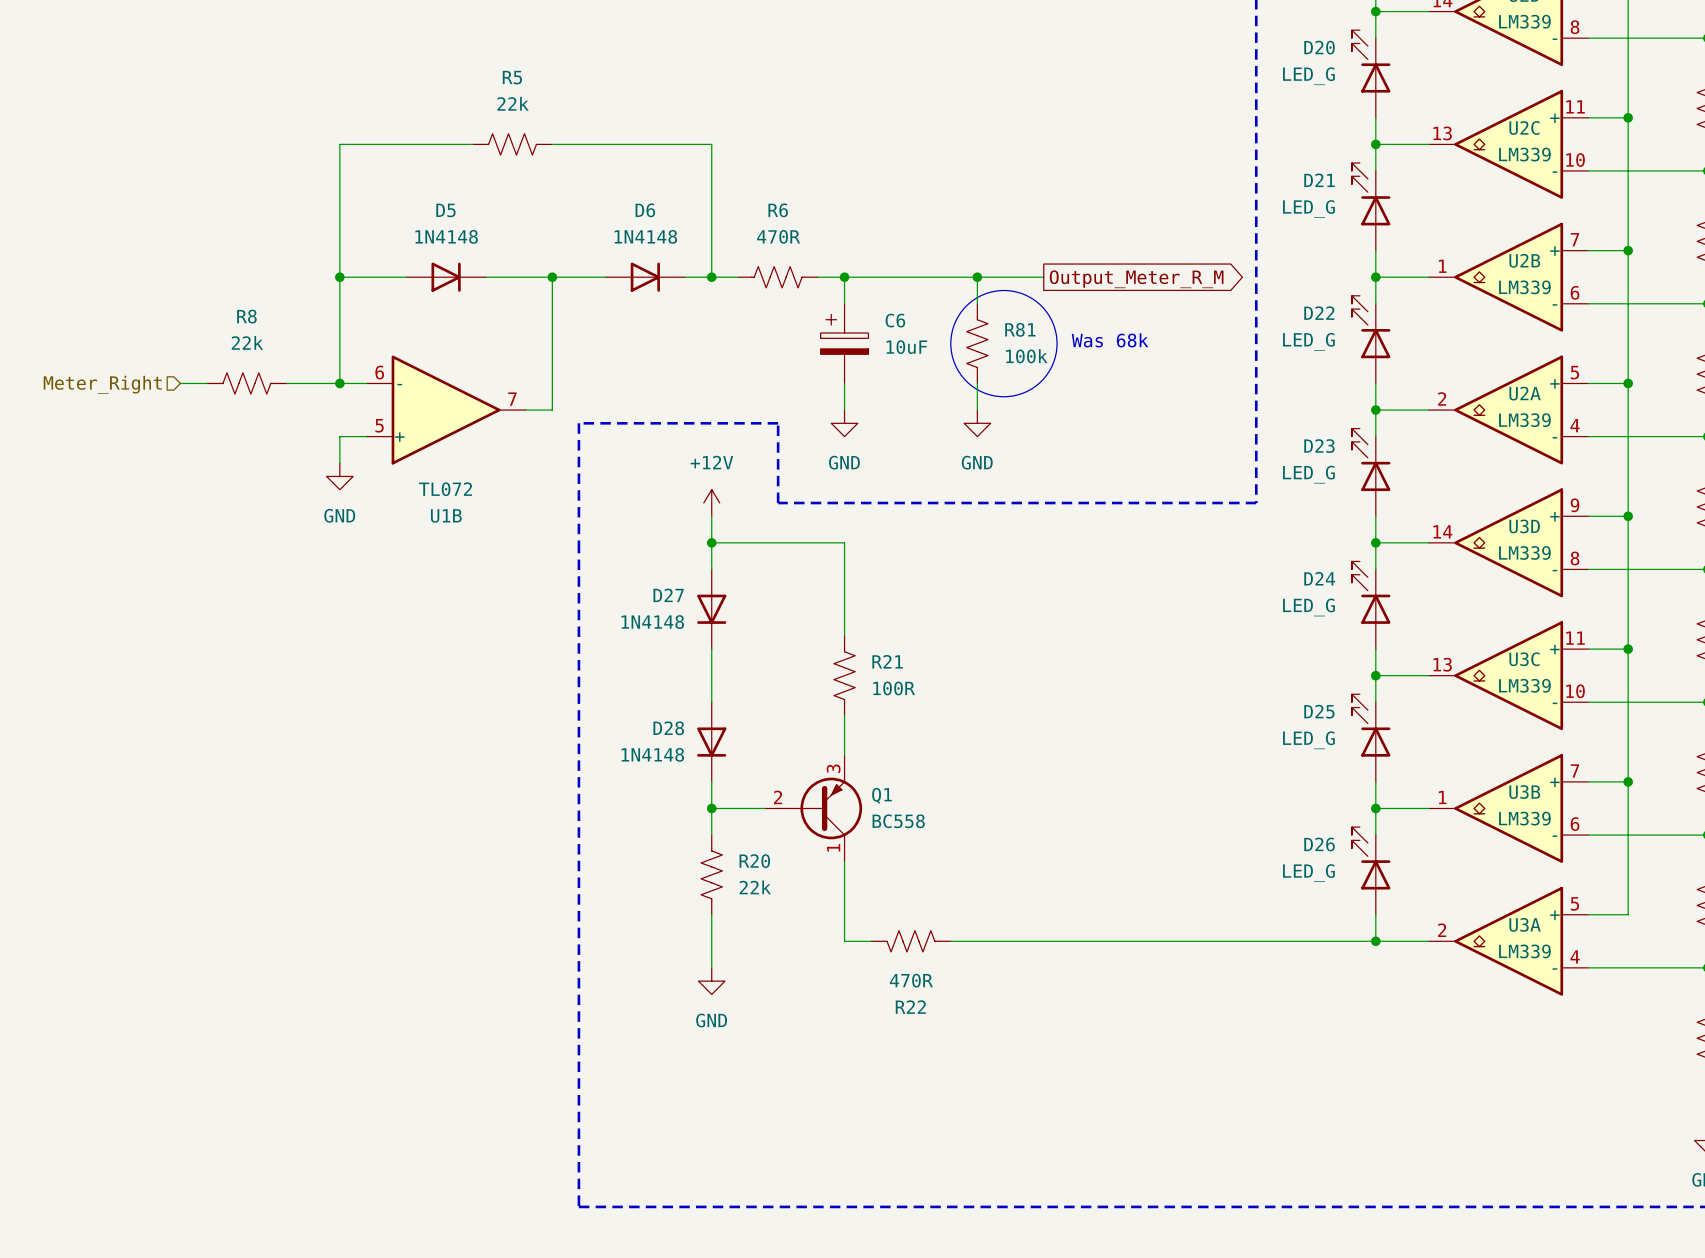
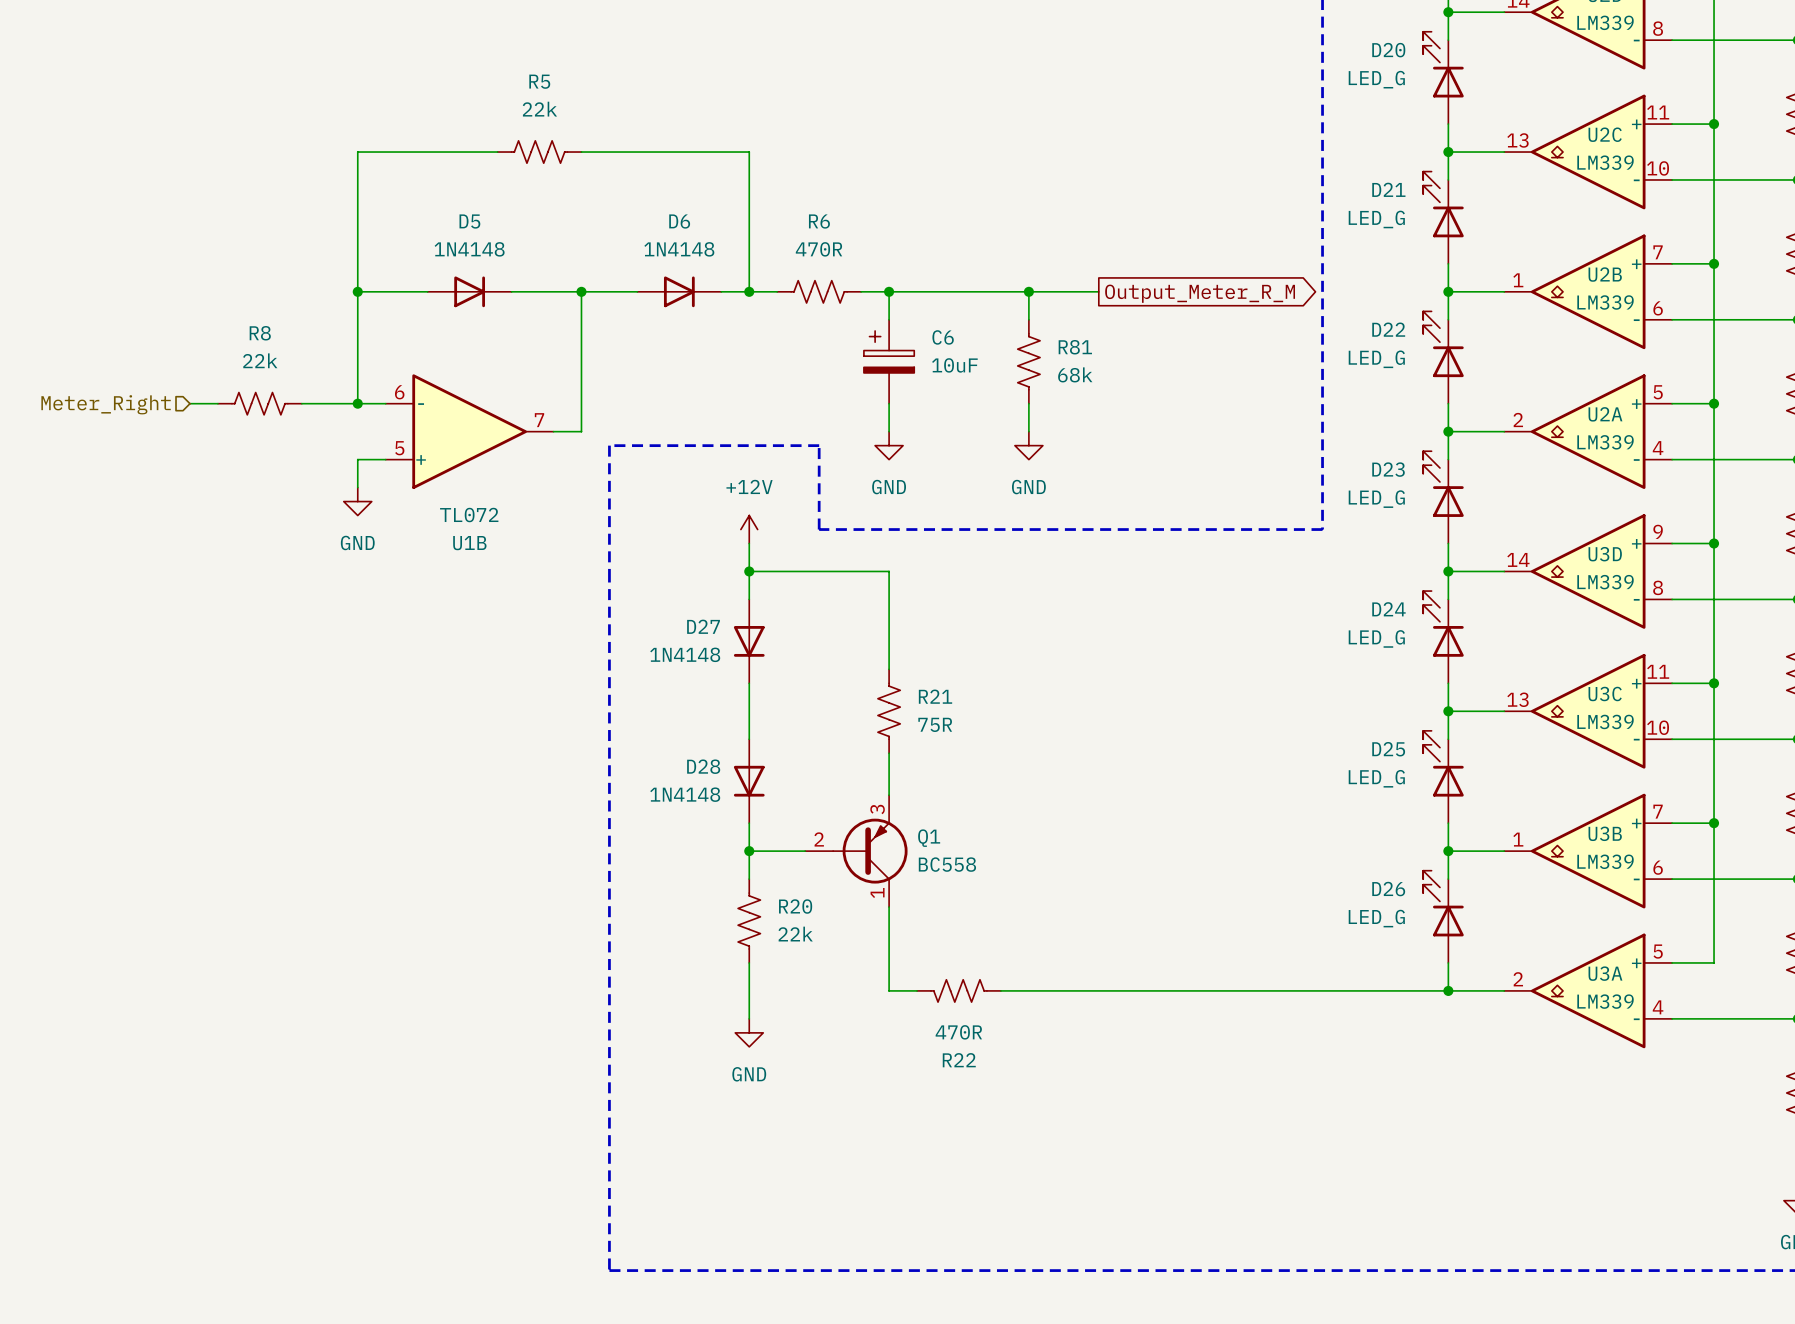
drawing: [950, 290, 1058, 397] -> none
text: Was 68k (1110, 340) -> none
R81 value: 100k (1026, 356) -> 68k (1075, 374)
R21 value: 100R (894, 688) -> 75R (935, 724)

